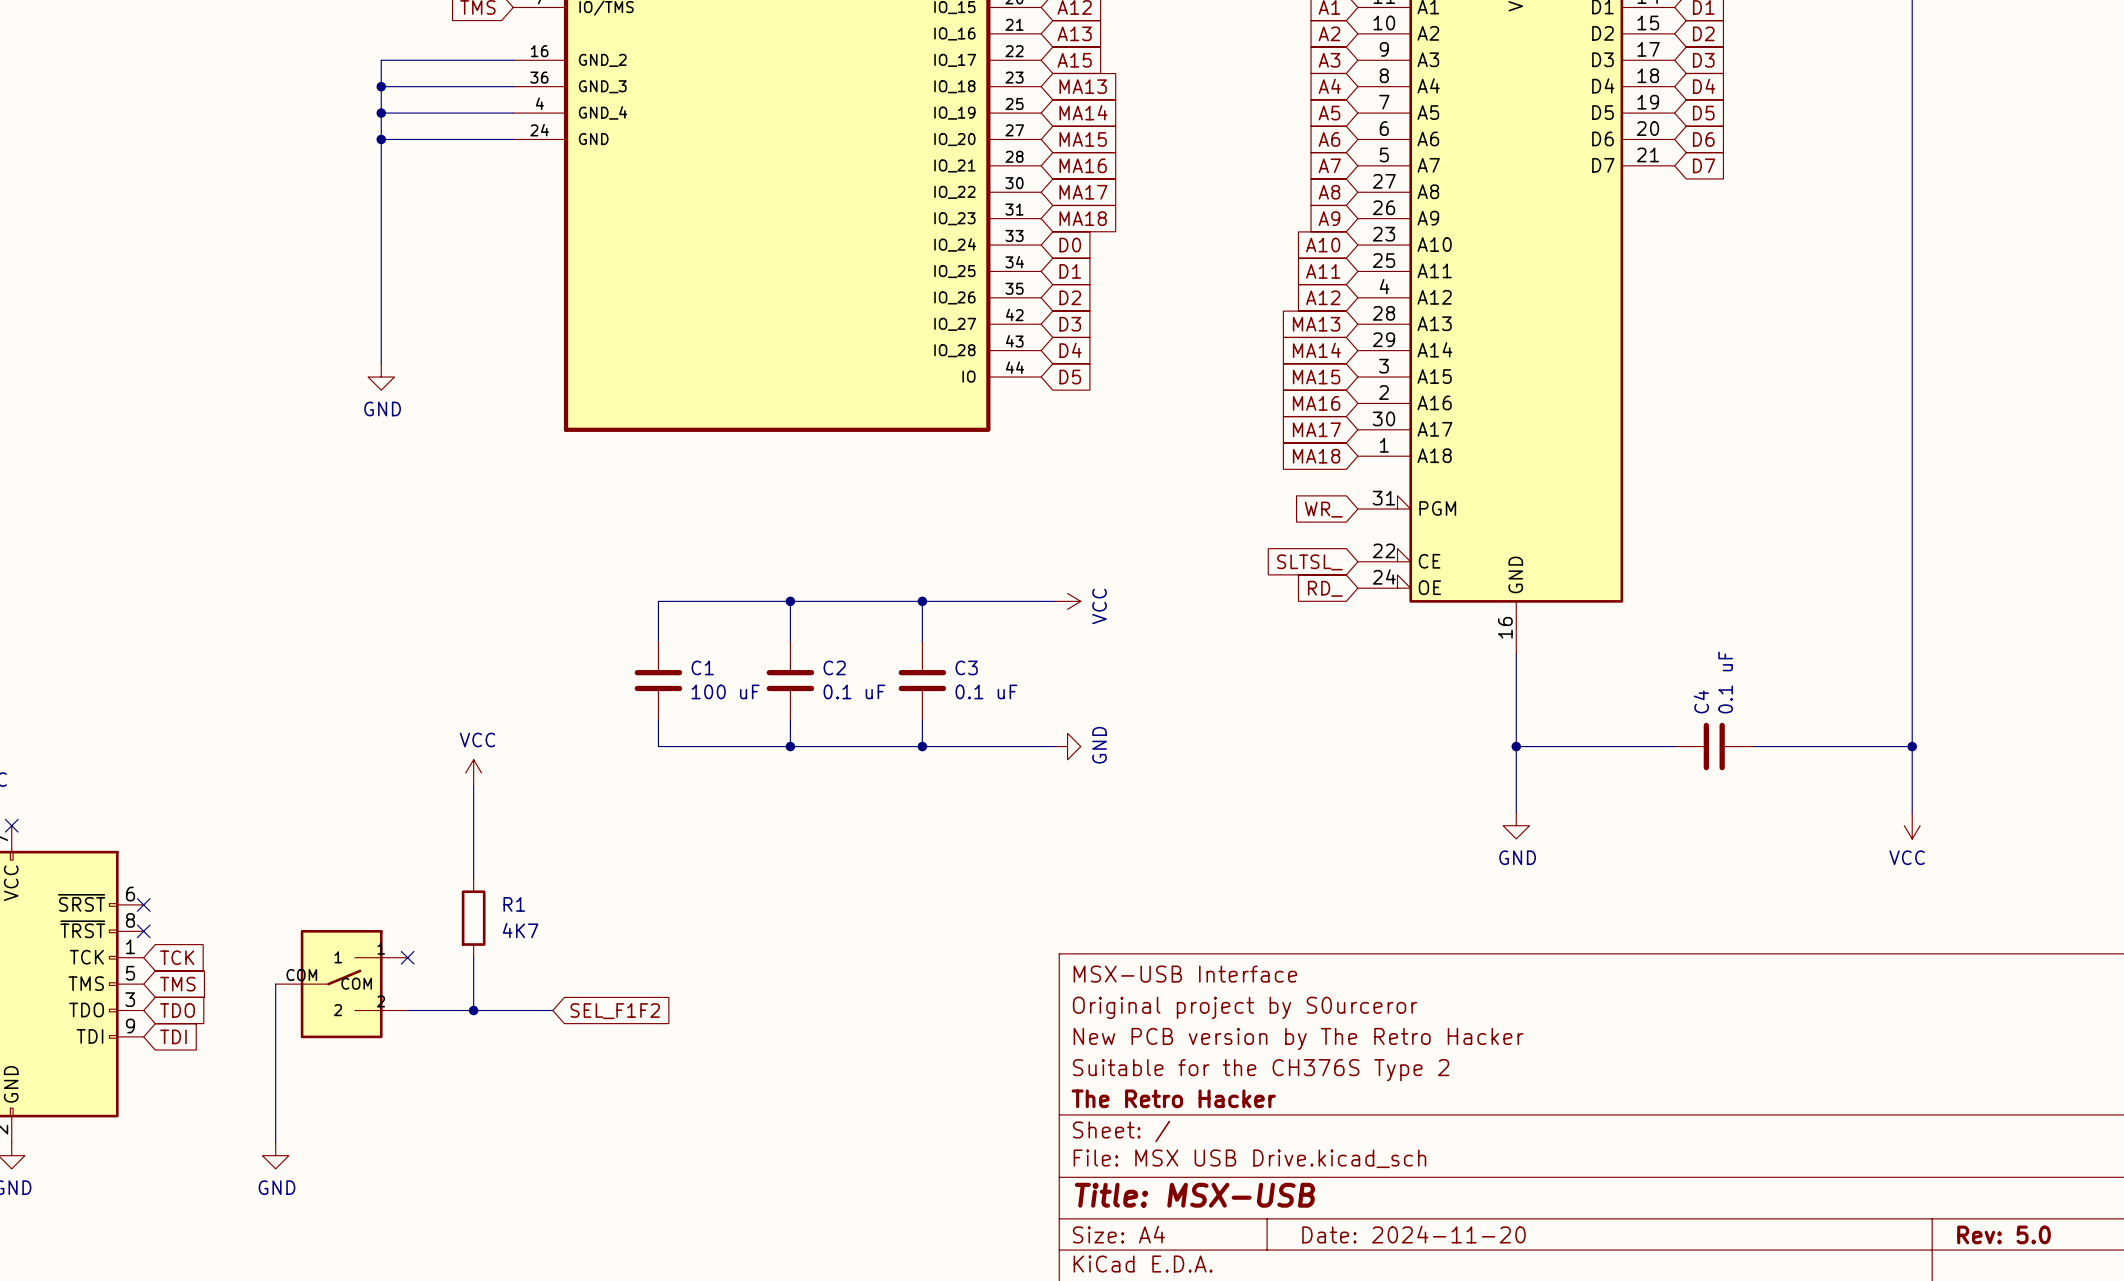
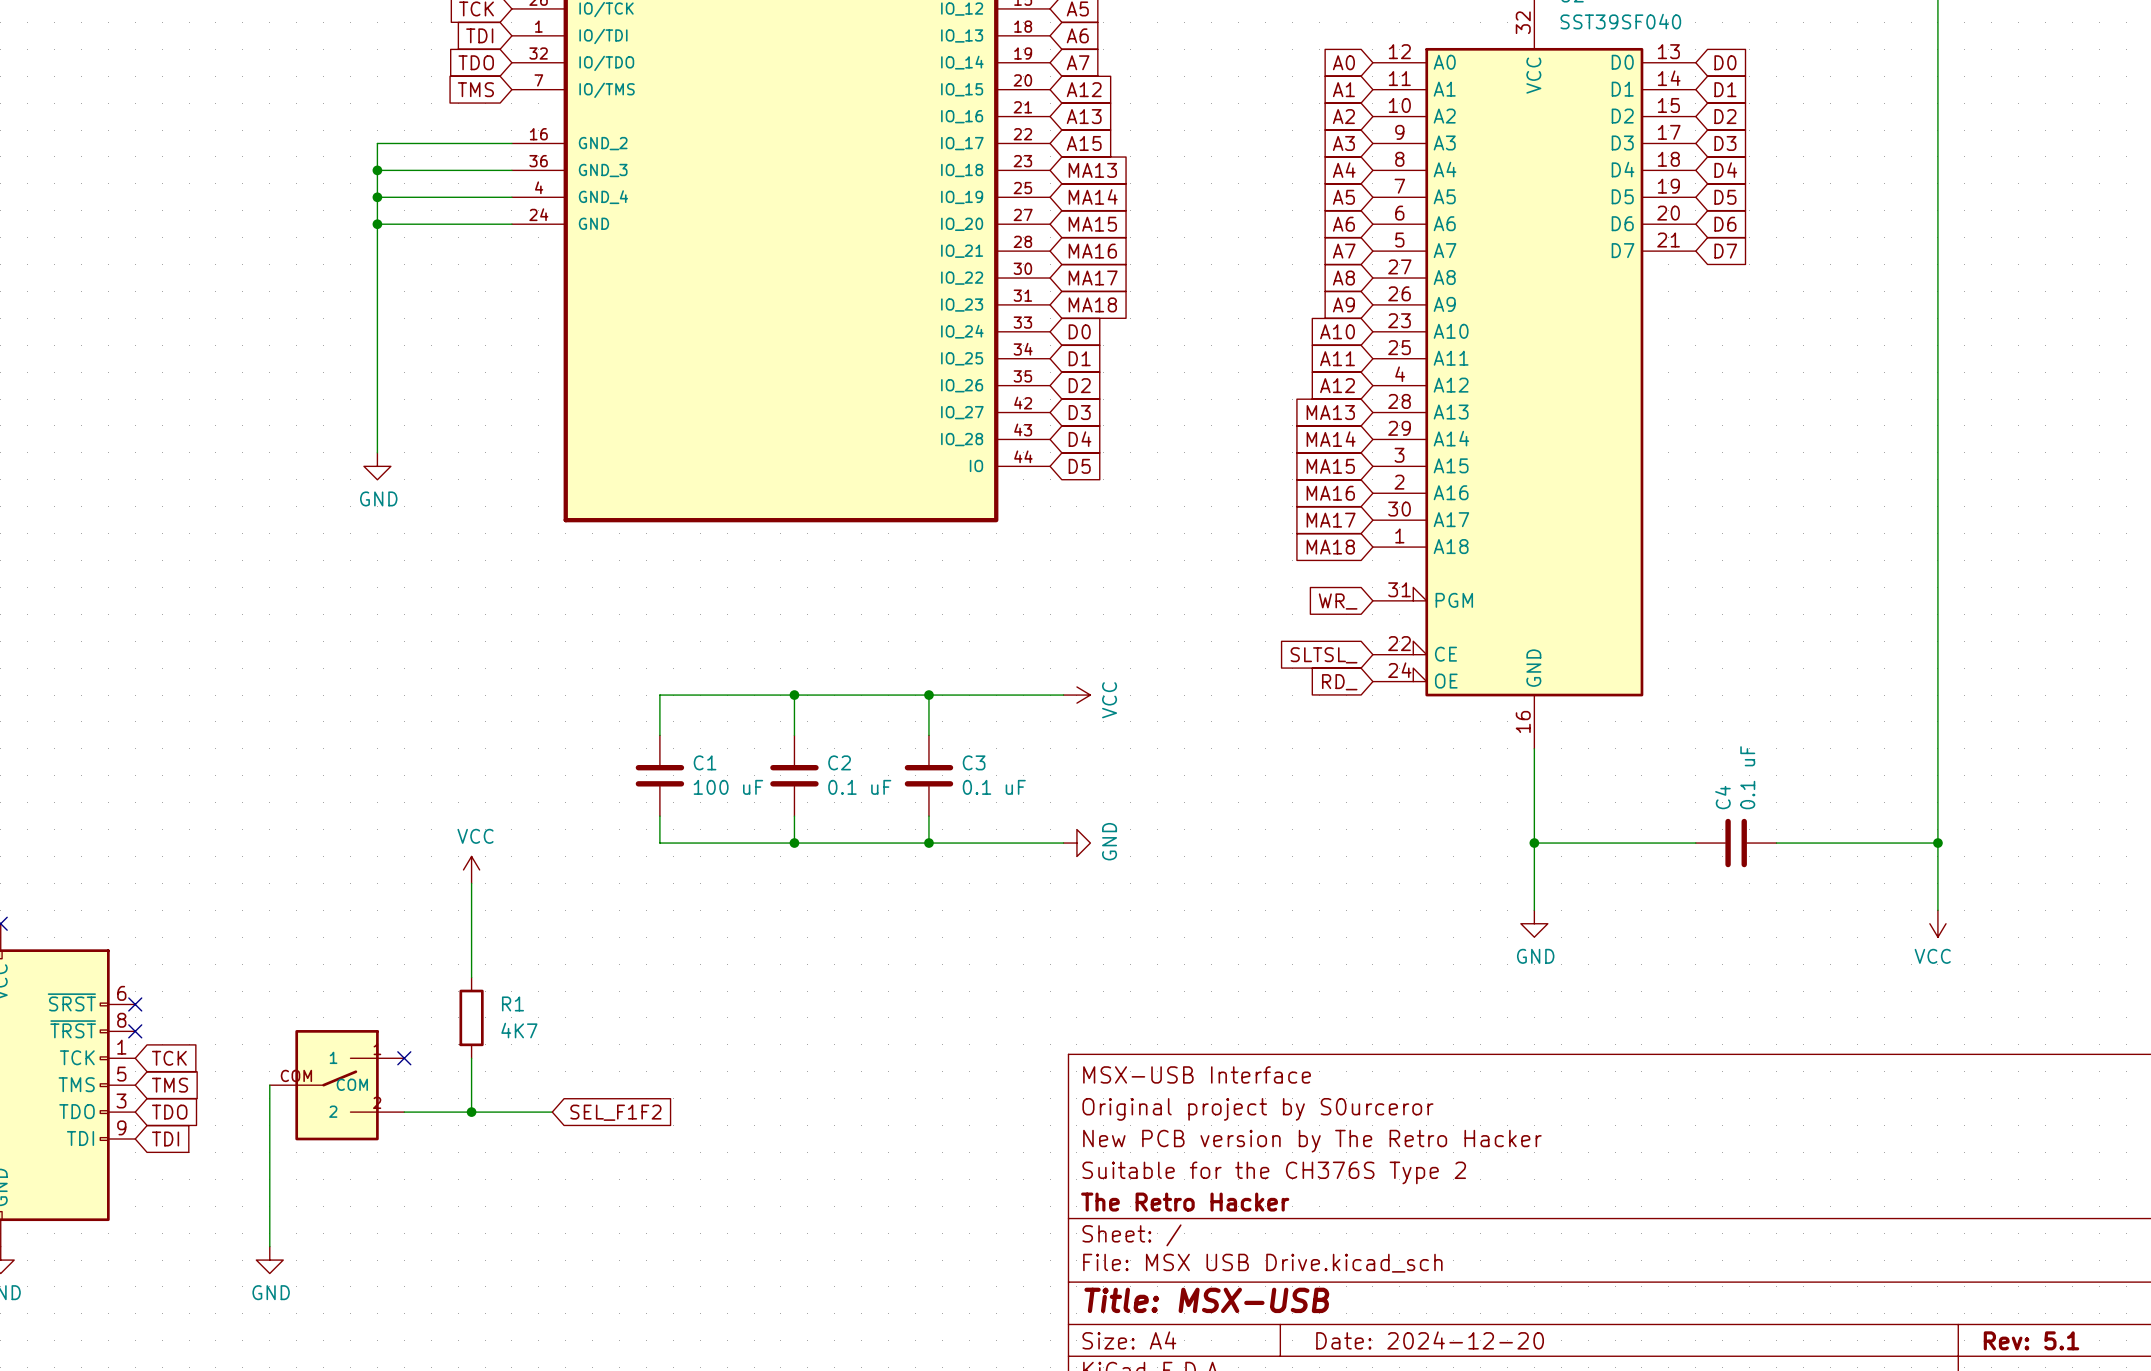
title block: Date: 2024-11-20 (1413, 1234) -> Date: 2024-12-20 (1430, 1340)
title block: Rev: 5.0 (2004, 1234) -> Rev: 5.1 (2031, 1340)

